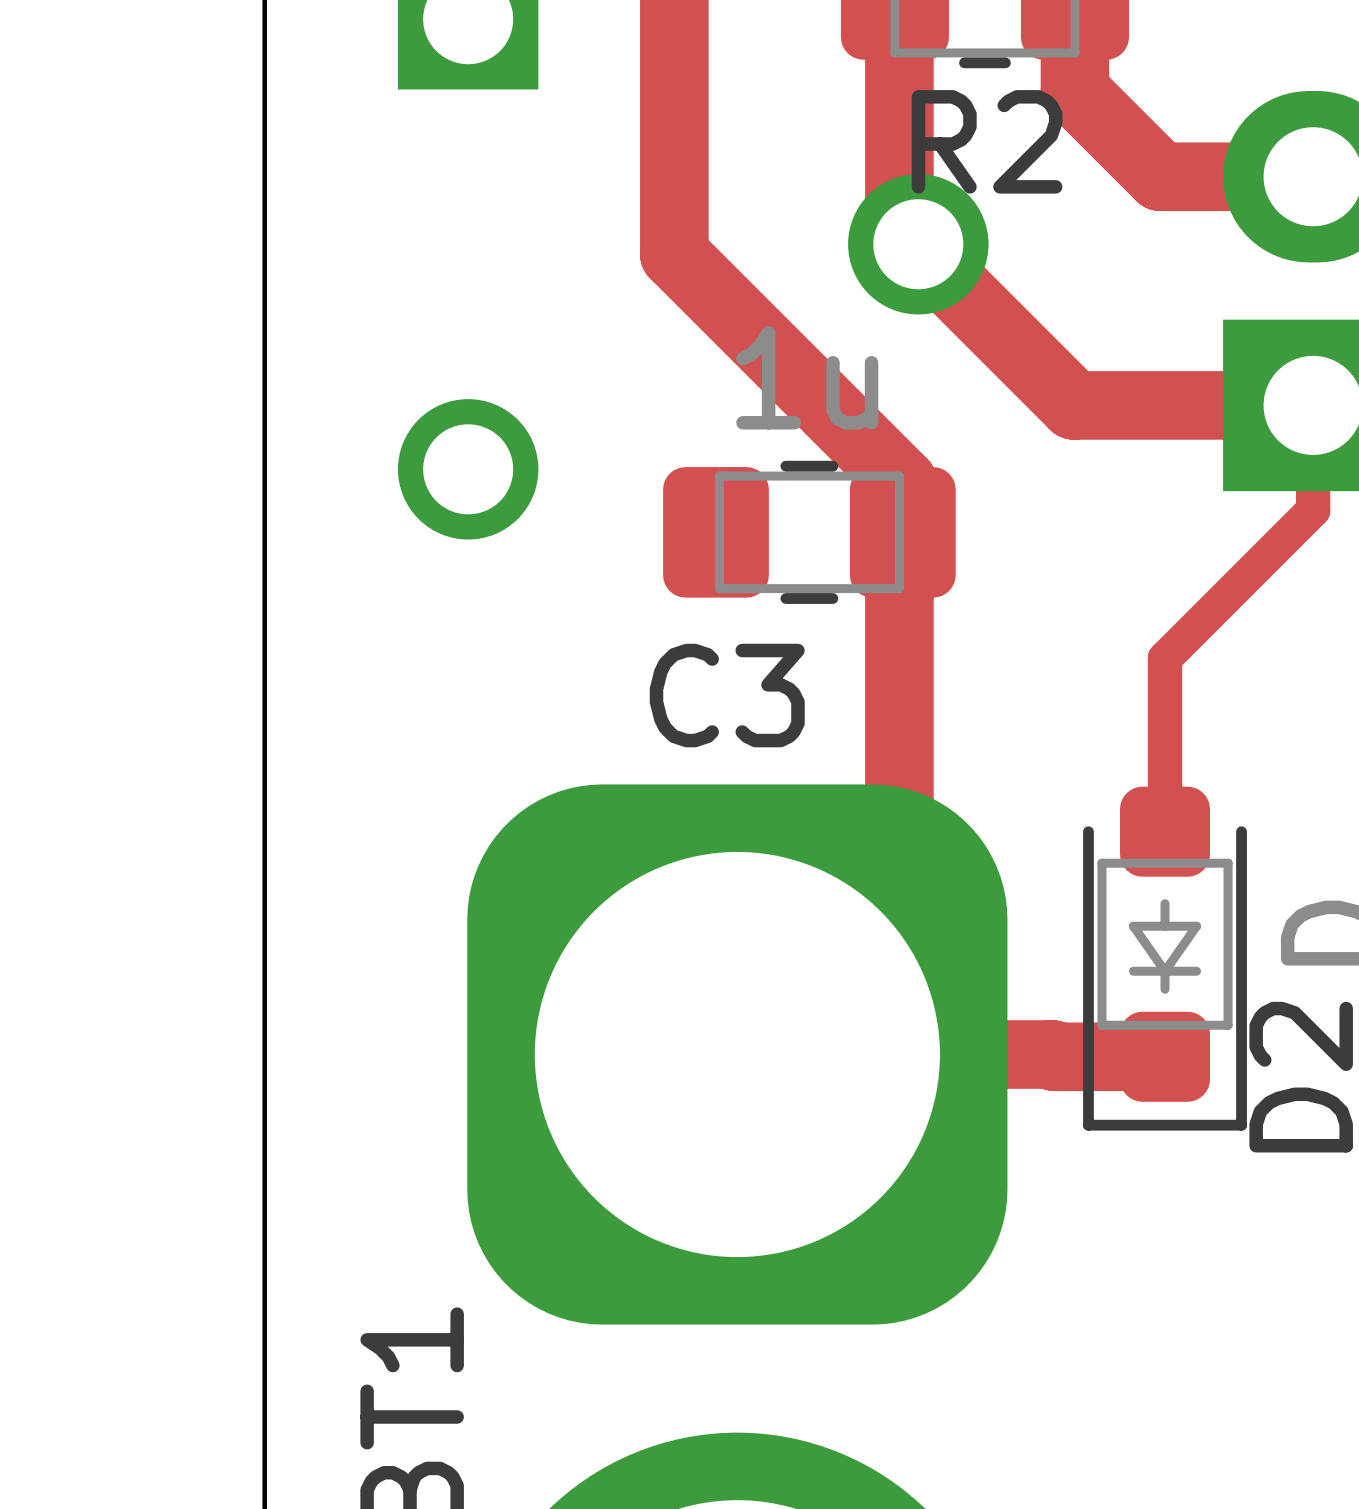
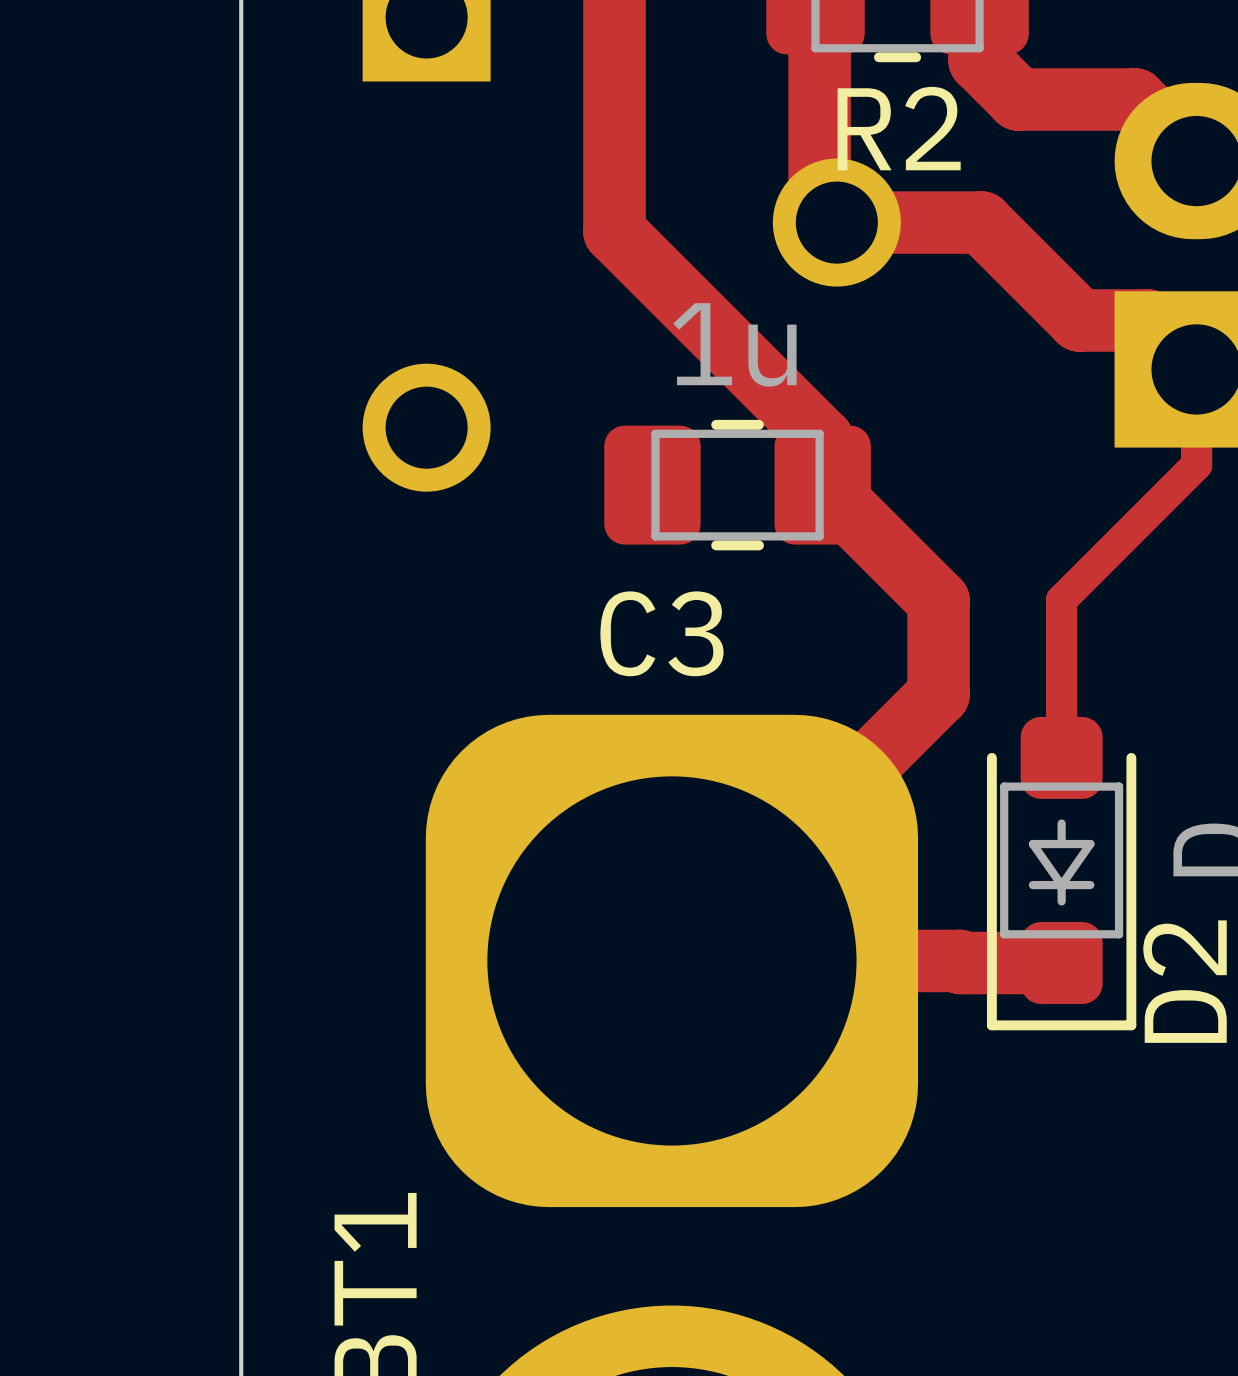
top track: (1074, 66) (1074, 91) (1160, 176) (1313, 176) -> (979, 60) (1018, 99) (1135, 99) (1196, 161)
top track: (918, 244) (918, 249) (1074, 405) (1313, 405) -> (836, 222) (981, 222) (1079, 320) (1147, 320) (1196, 369)
top track: (902, 532) (899, 535) (899, 892) -> (822, 485) (938, 600) (938, 694) (819, 813)

